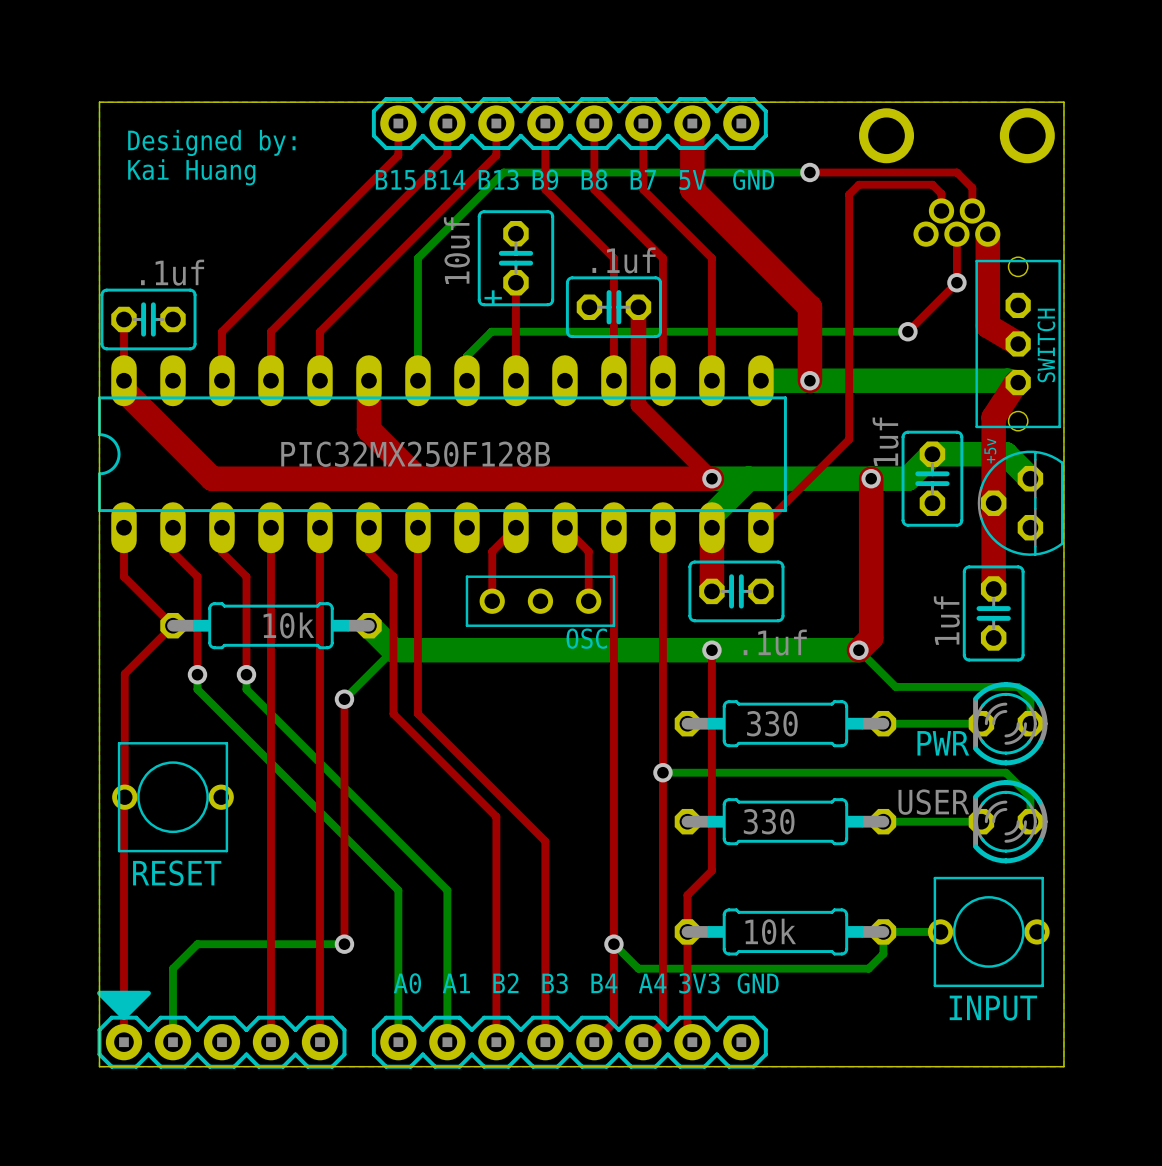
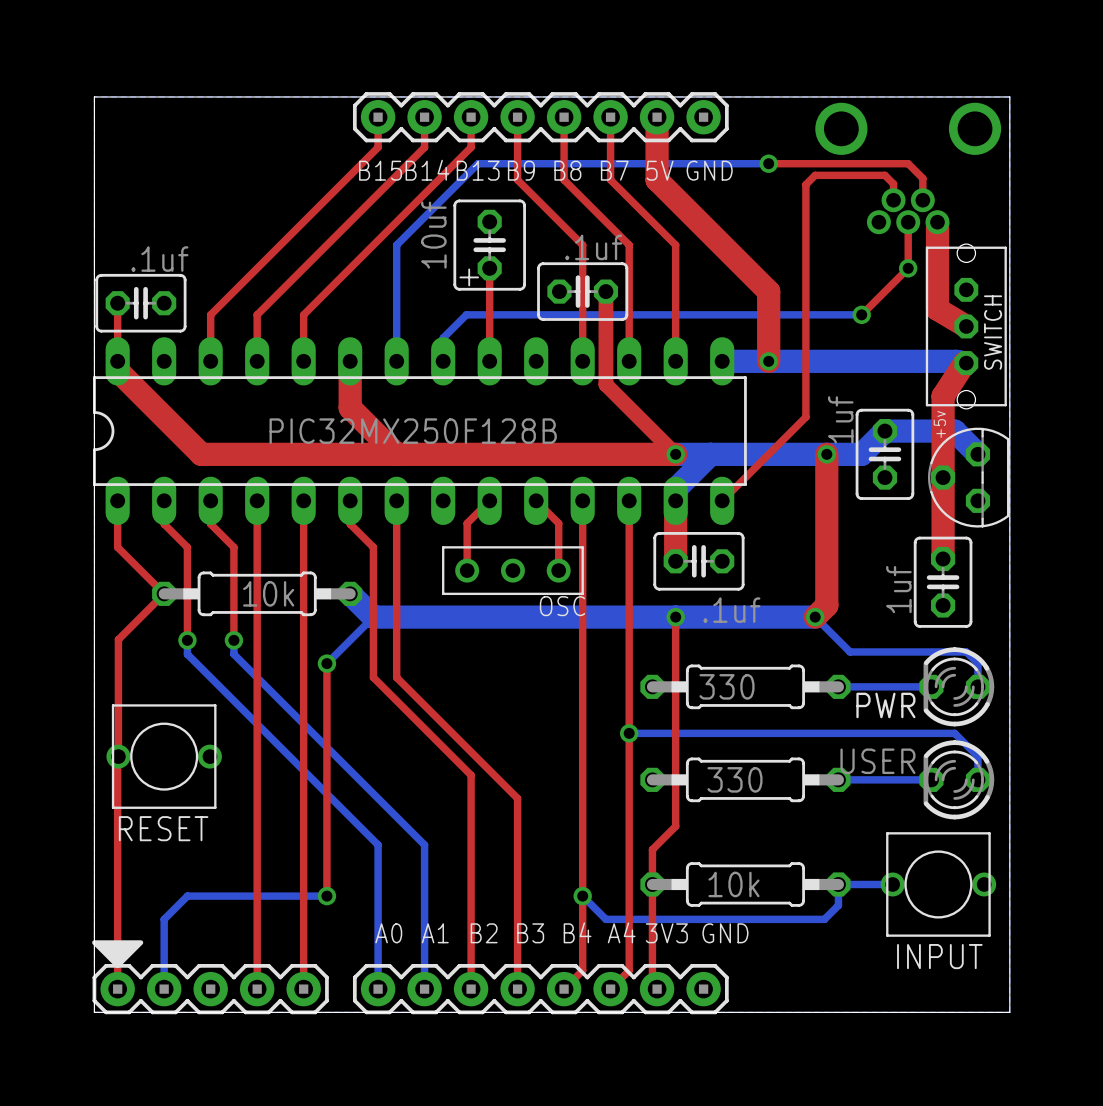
text: Designed by: (211, 142) -> none
text: Kai Huang (191, 172) -> none

